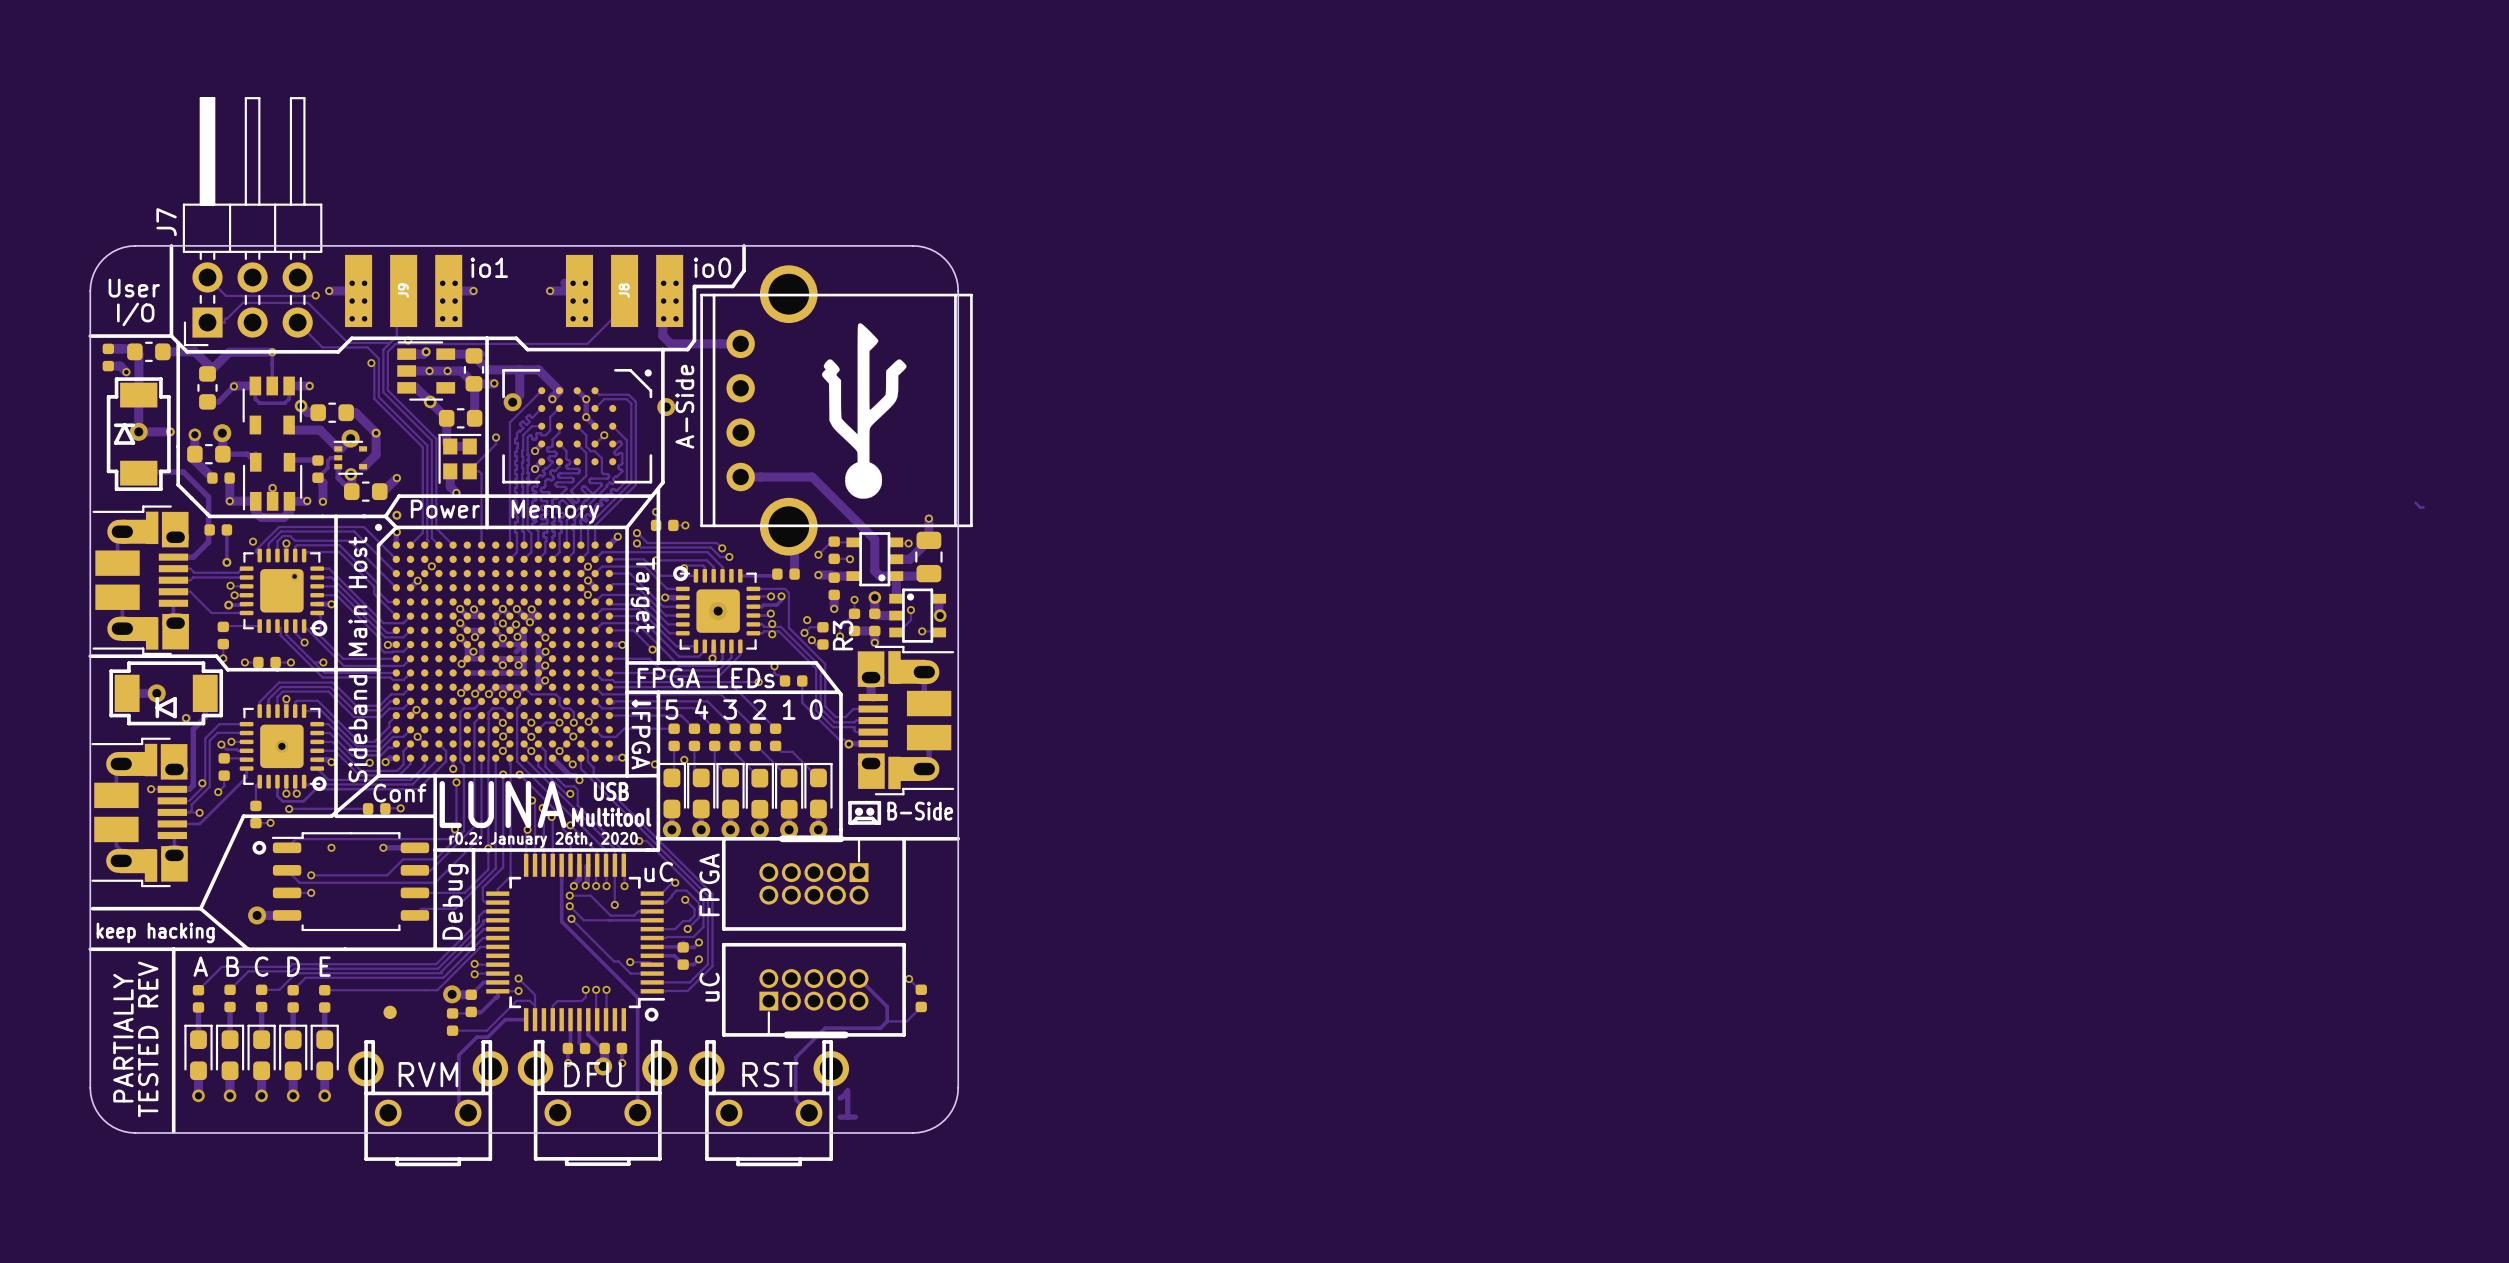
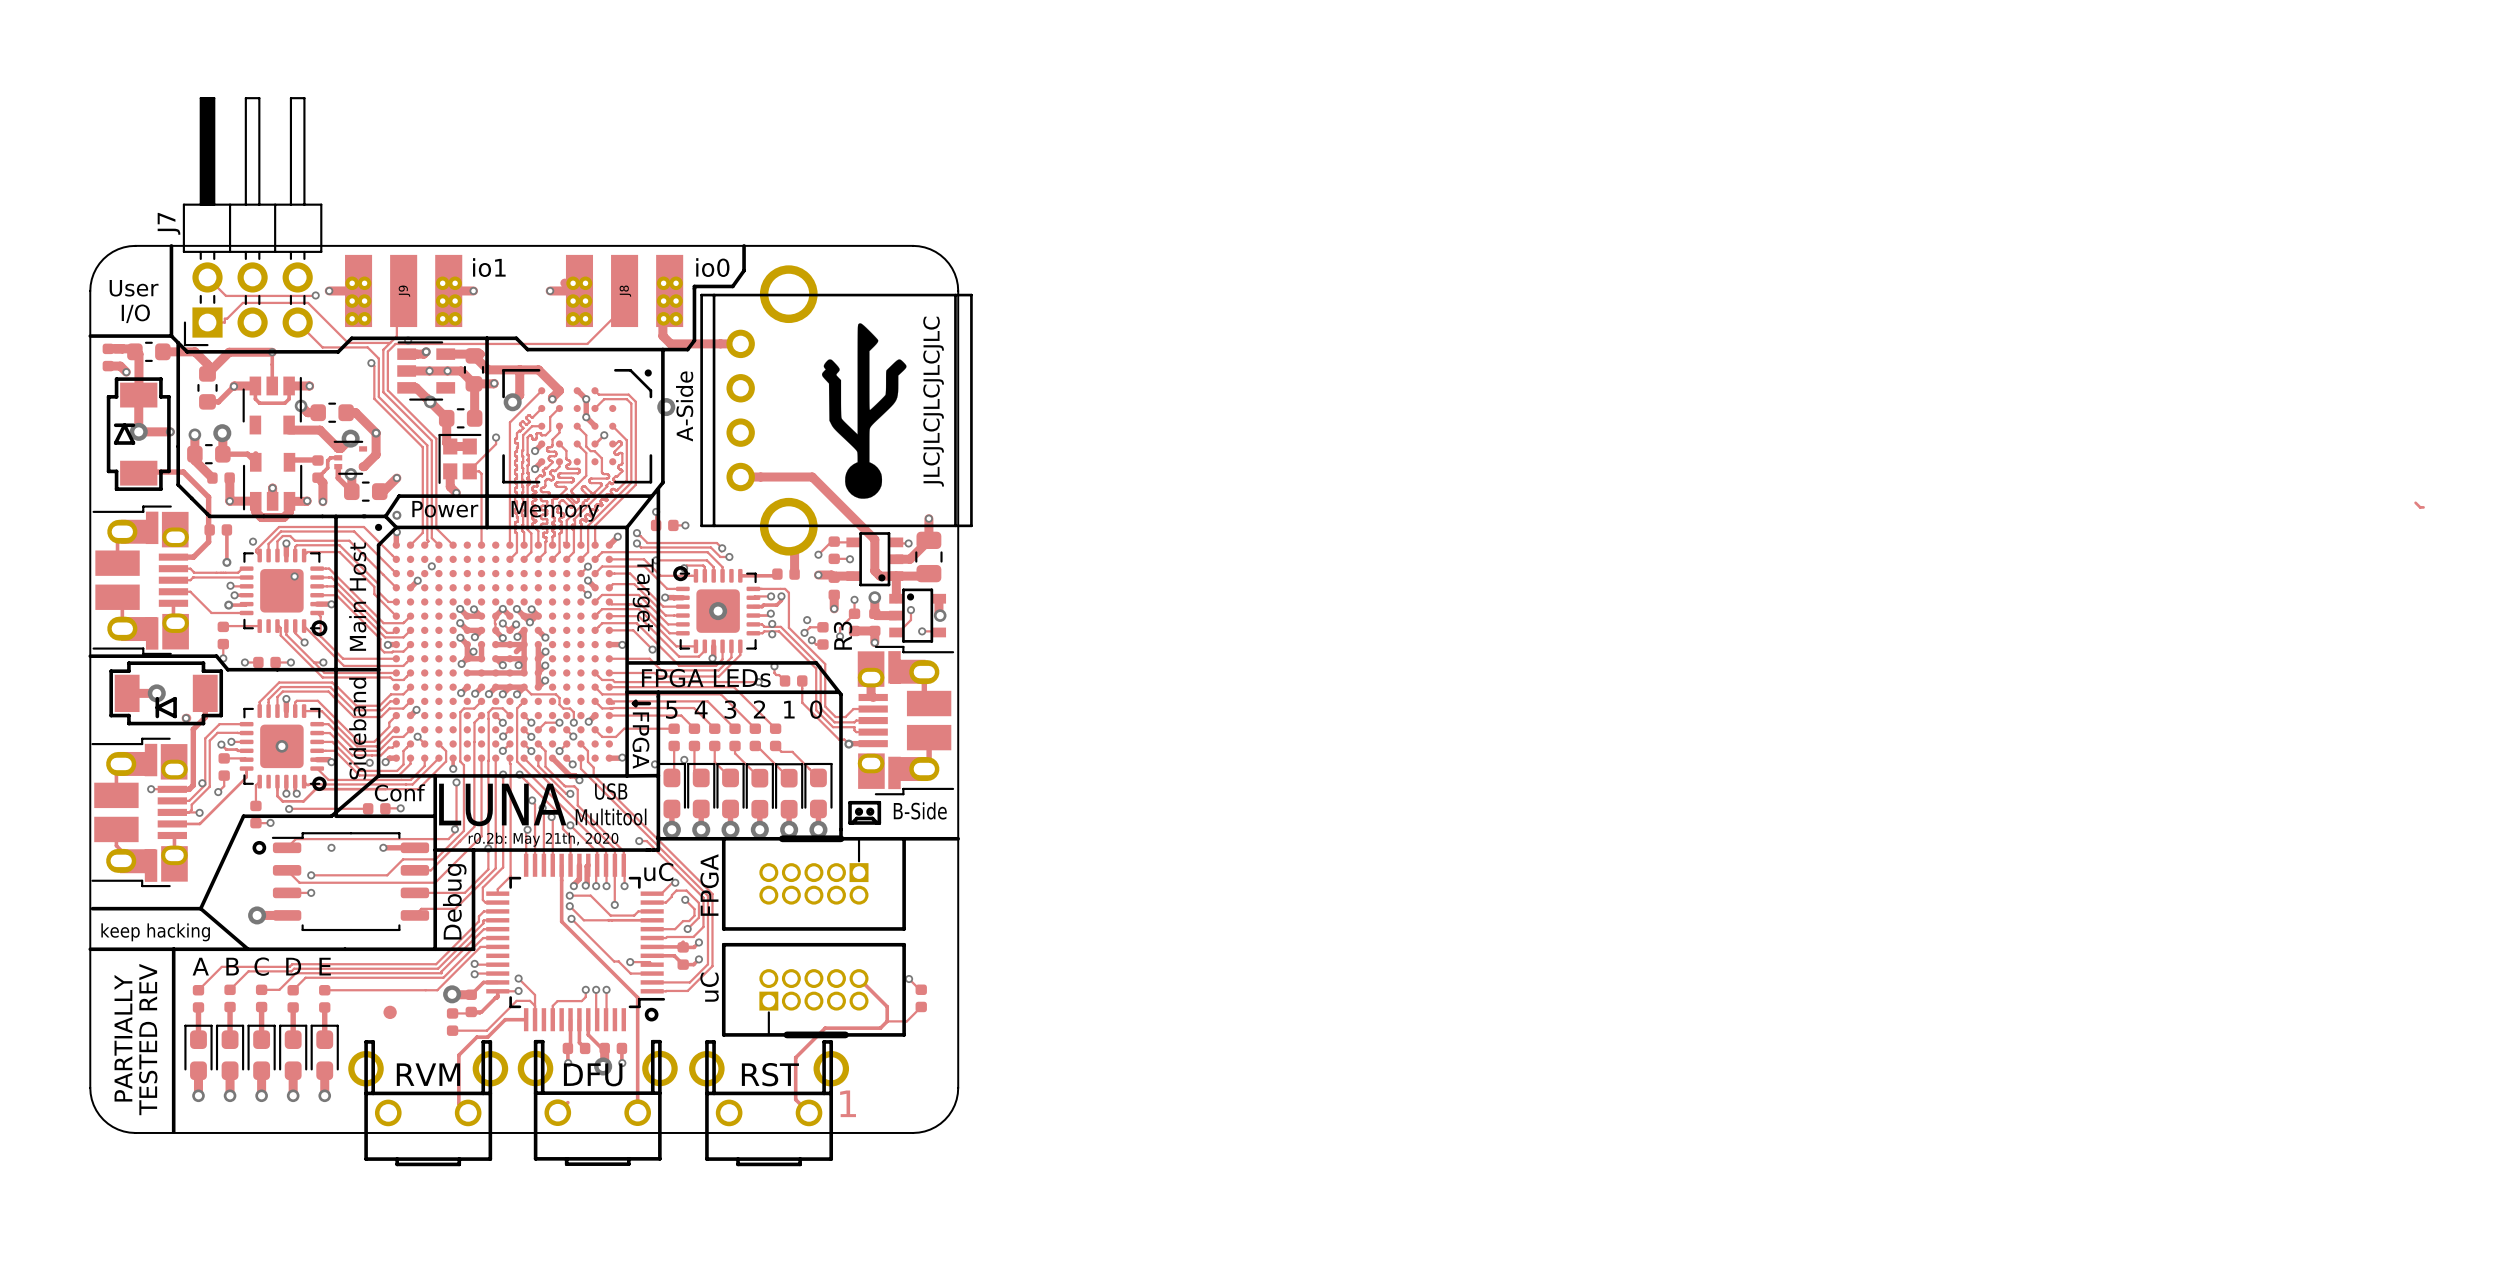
text: none -> JLCJLCJLCJLCJLC (933, 401)
text: r0.2: January 26th, 2020 (543, 840) -> r0.2b: May 21th, 2020 (543, 839)

